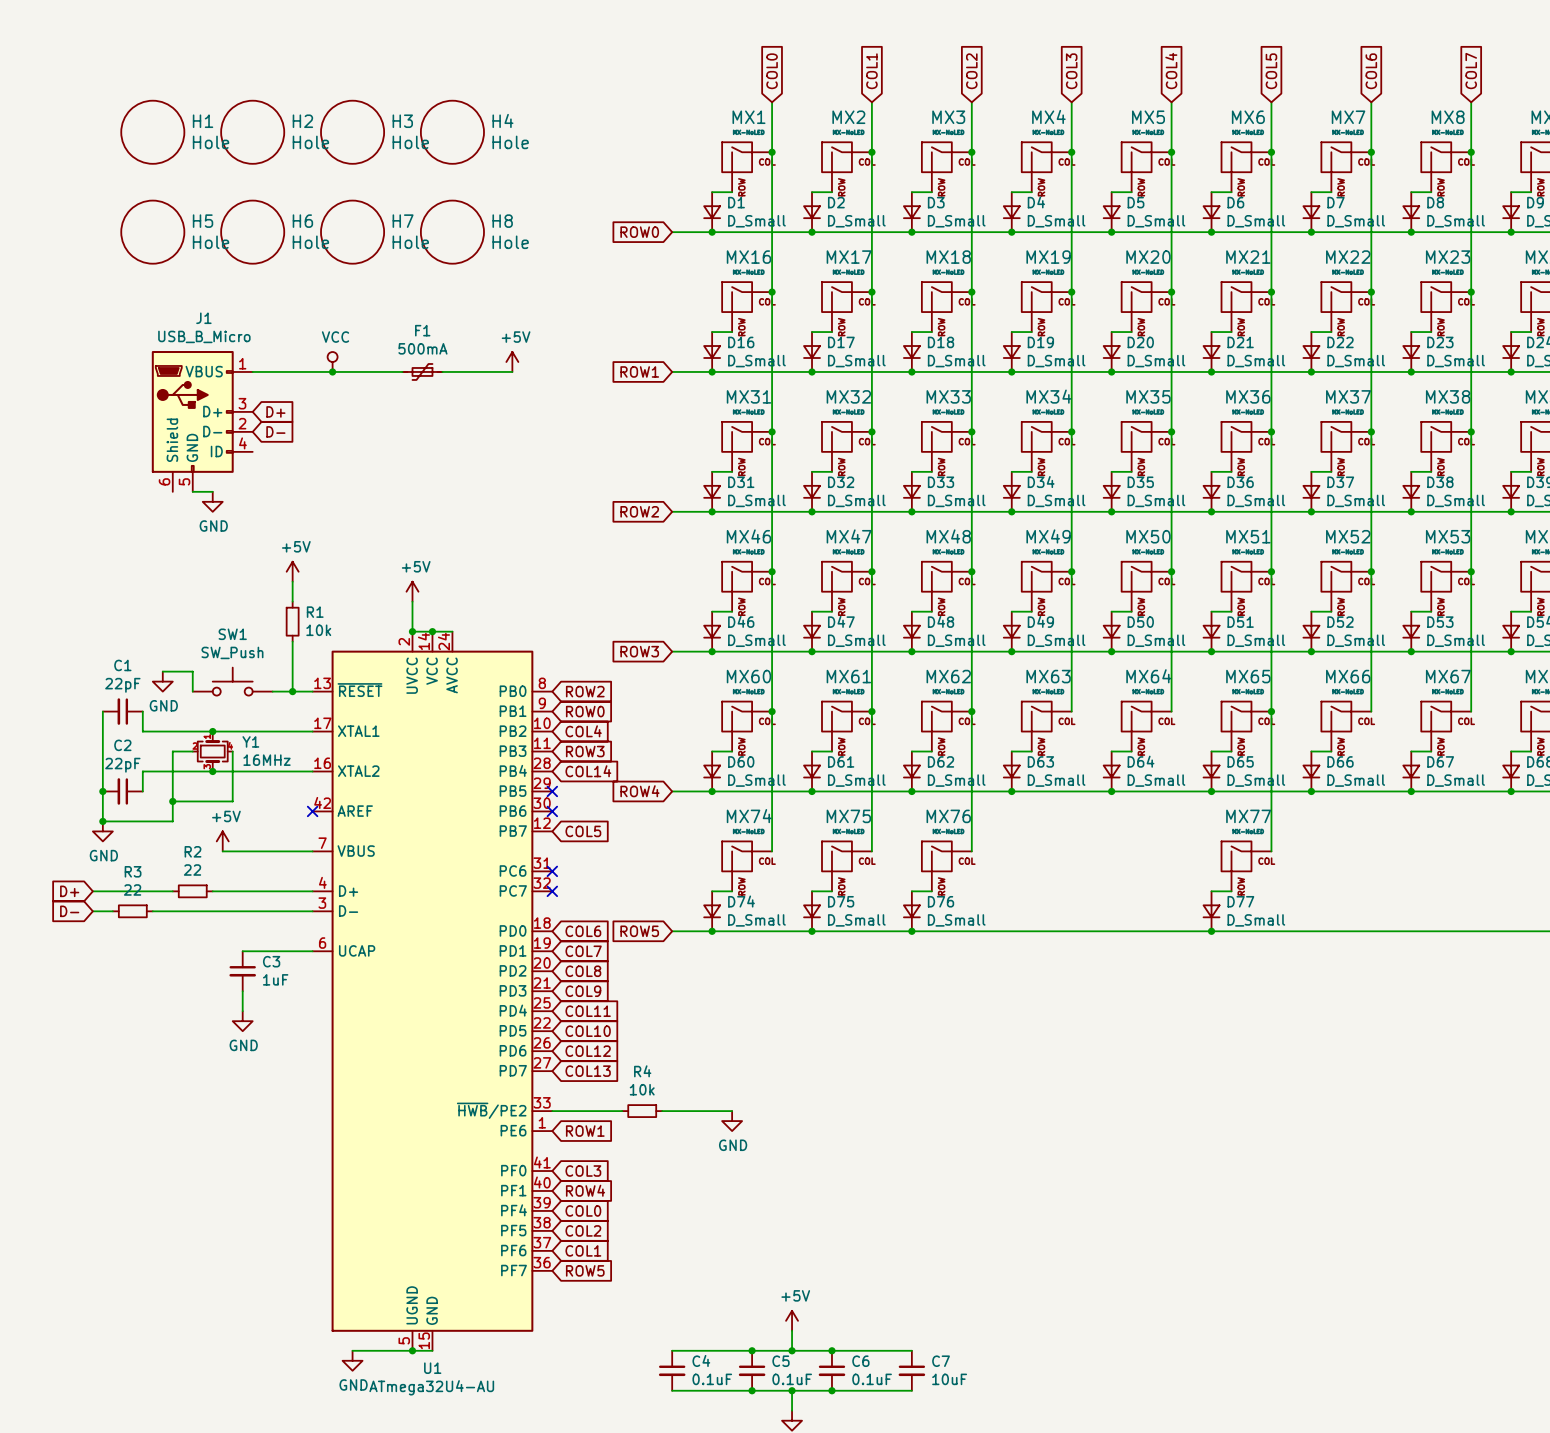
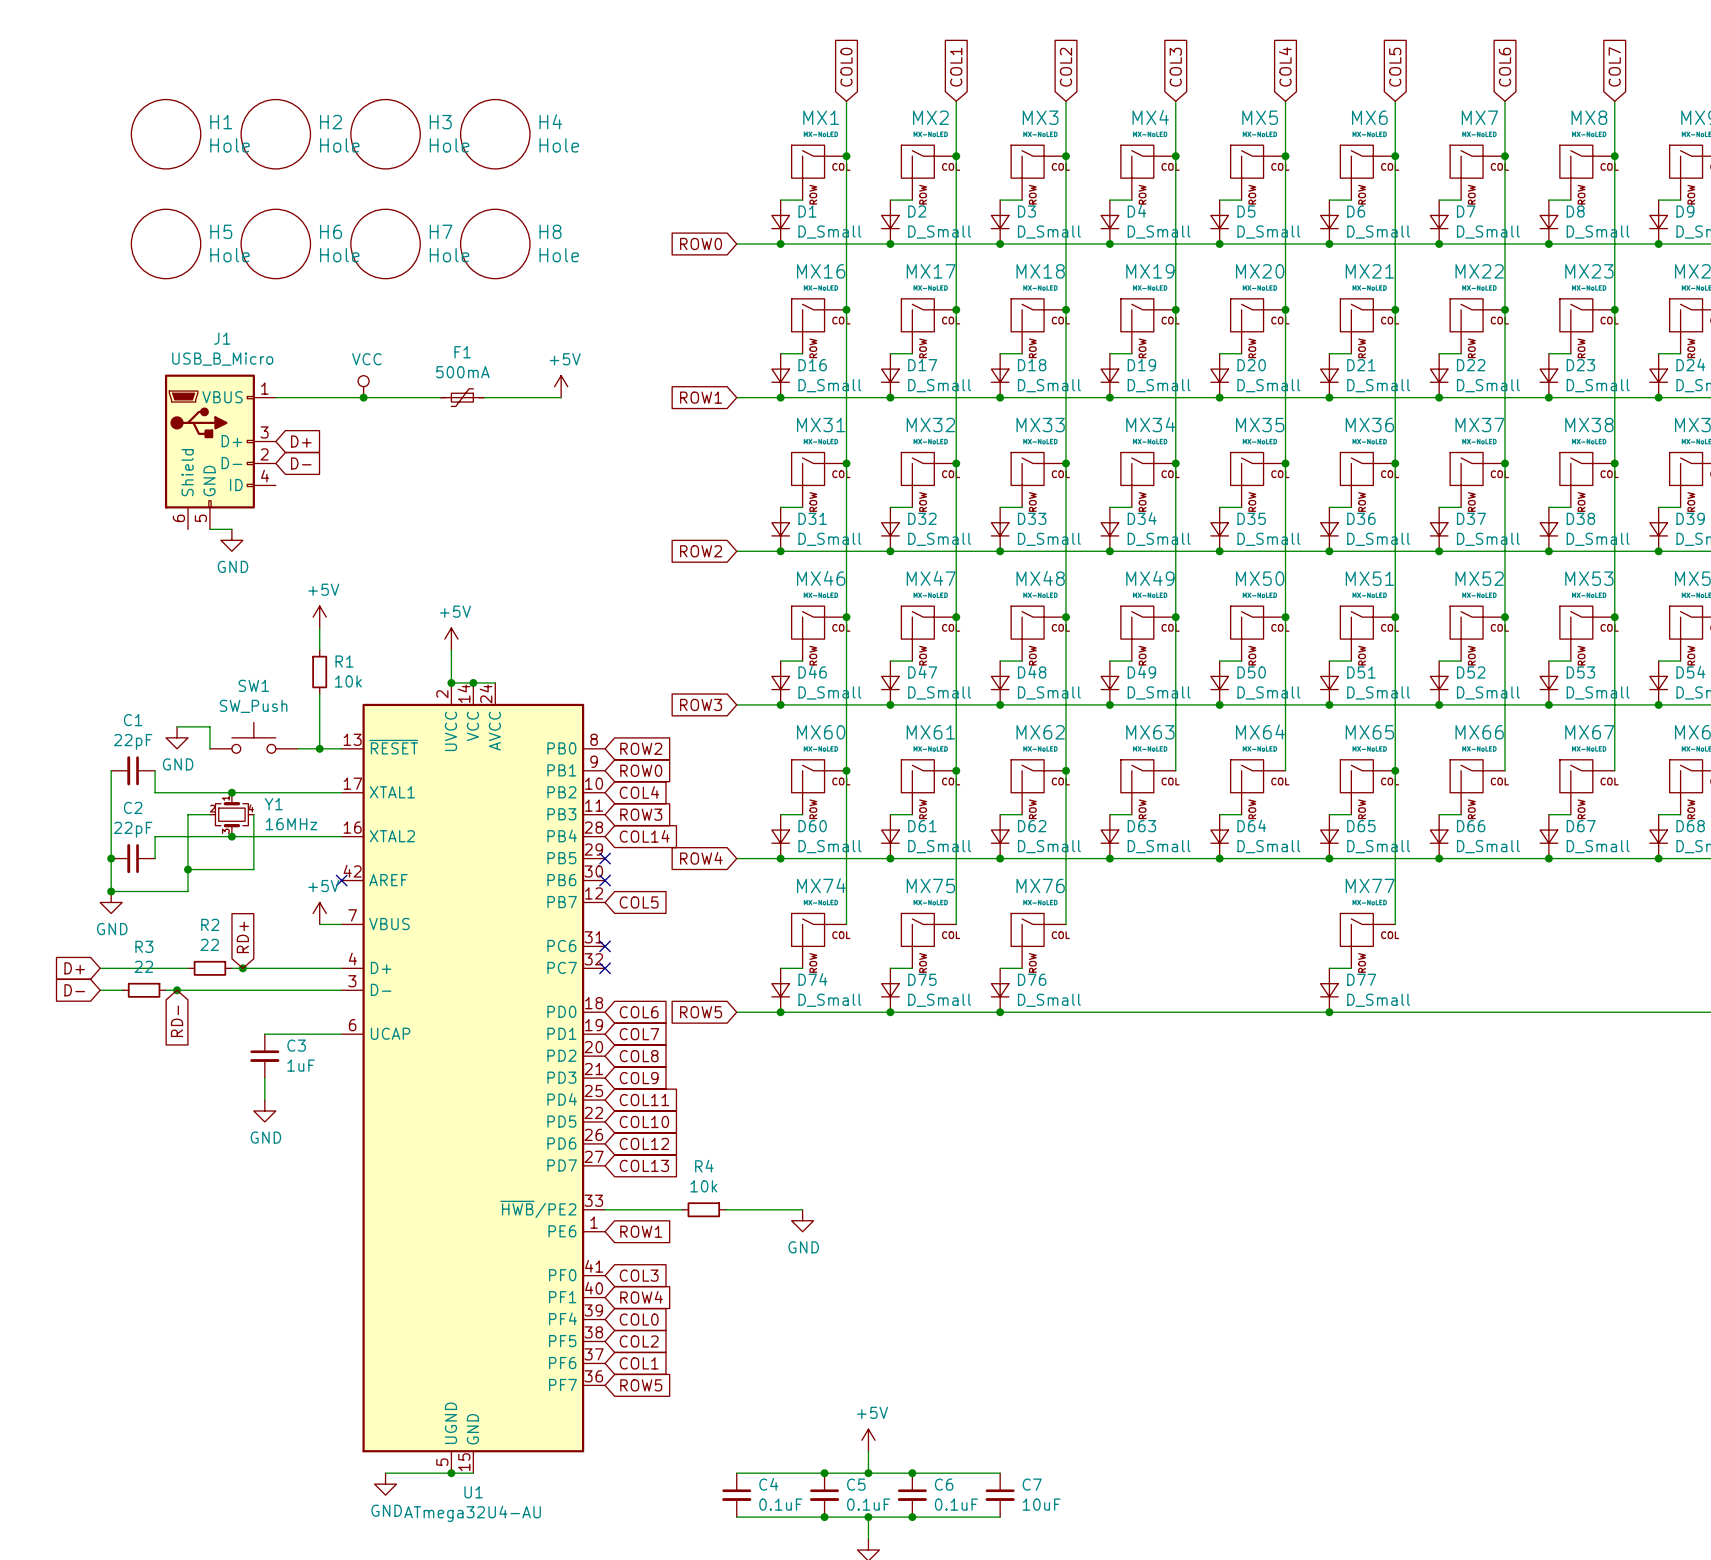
power symbol position: +5V (222, 841) -> +5V (319, 913)
wire: (222, 851) (292, 851) -> none
global label: none -> RD+ (242, 937)
junction: none -> (242, 968)
junction: none -> (177, 990)
global label: none -> RD- (177, 1021)

